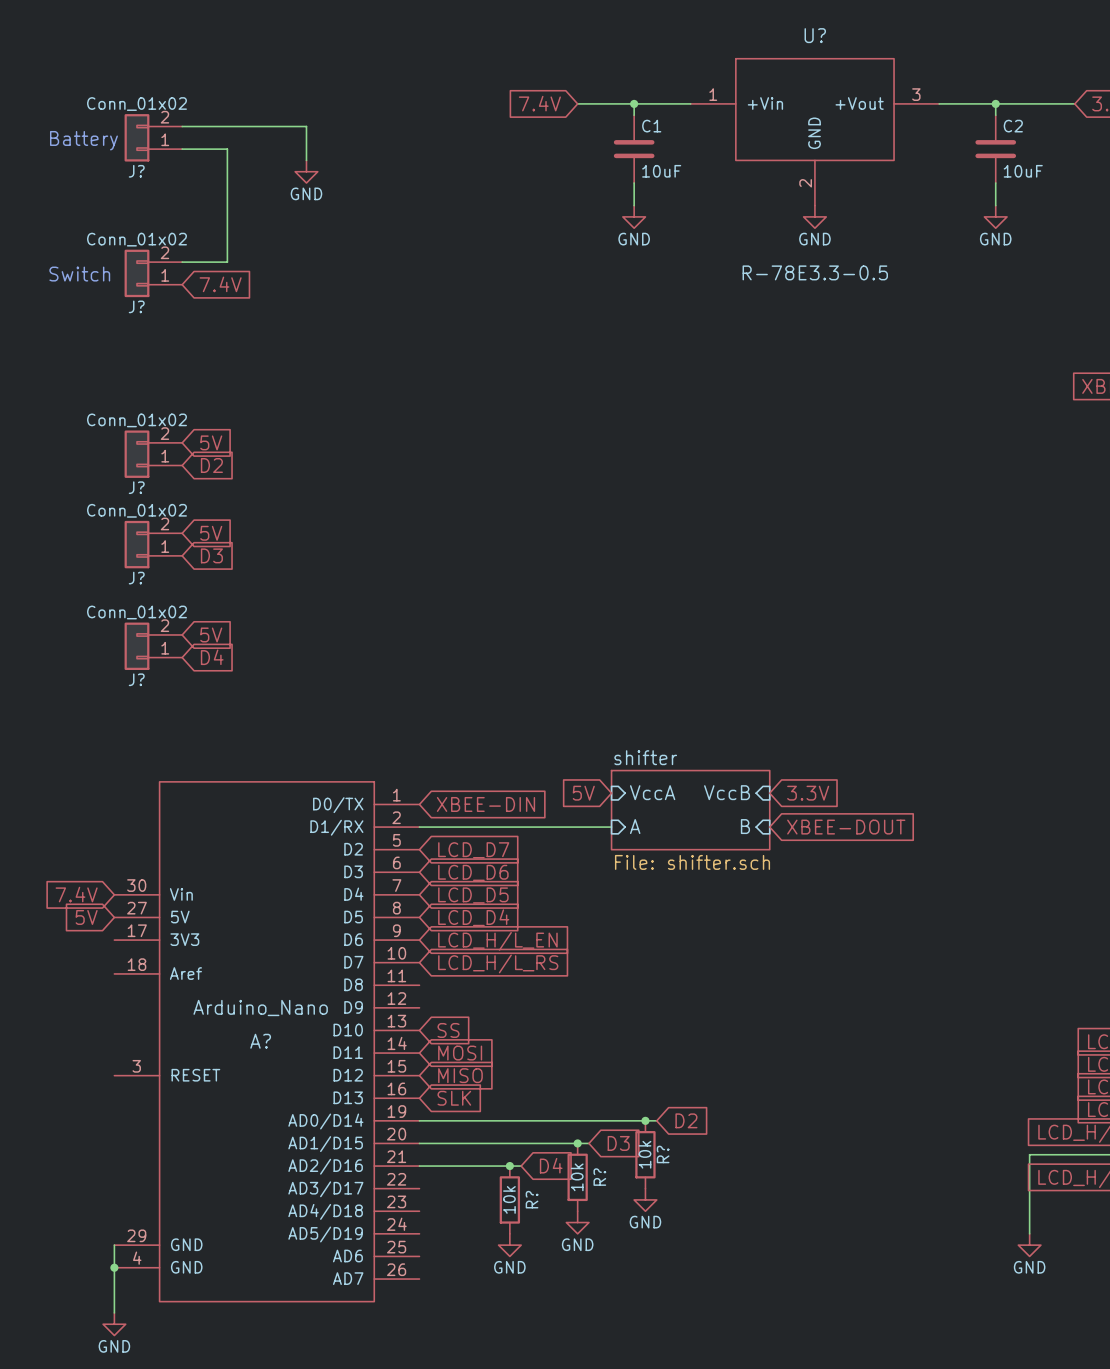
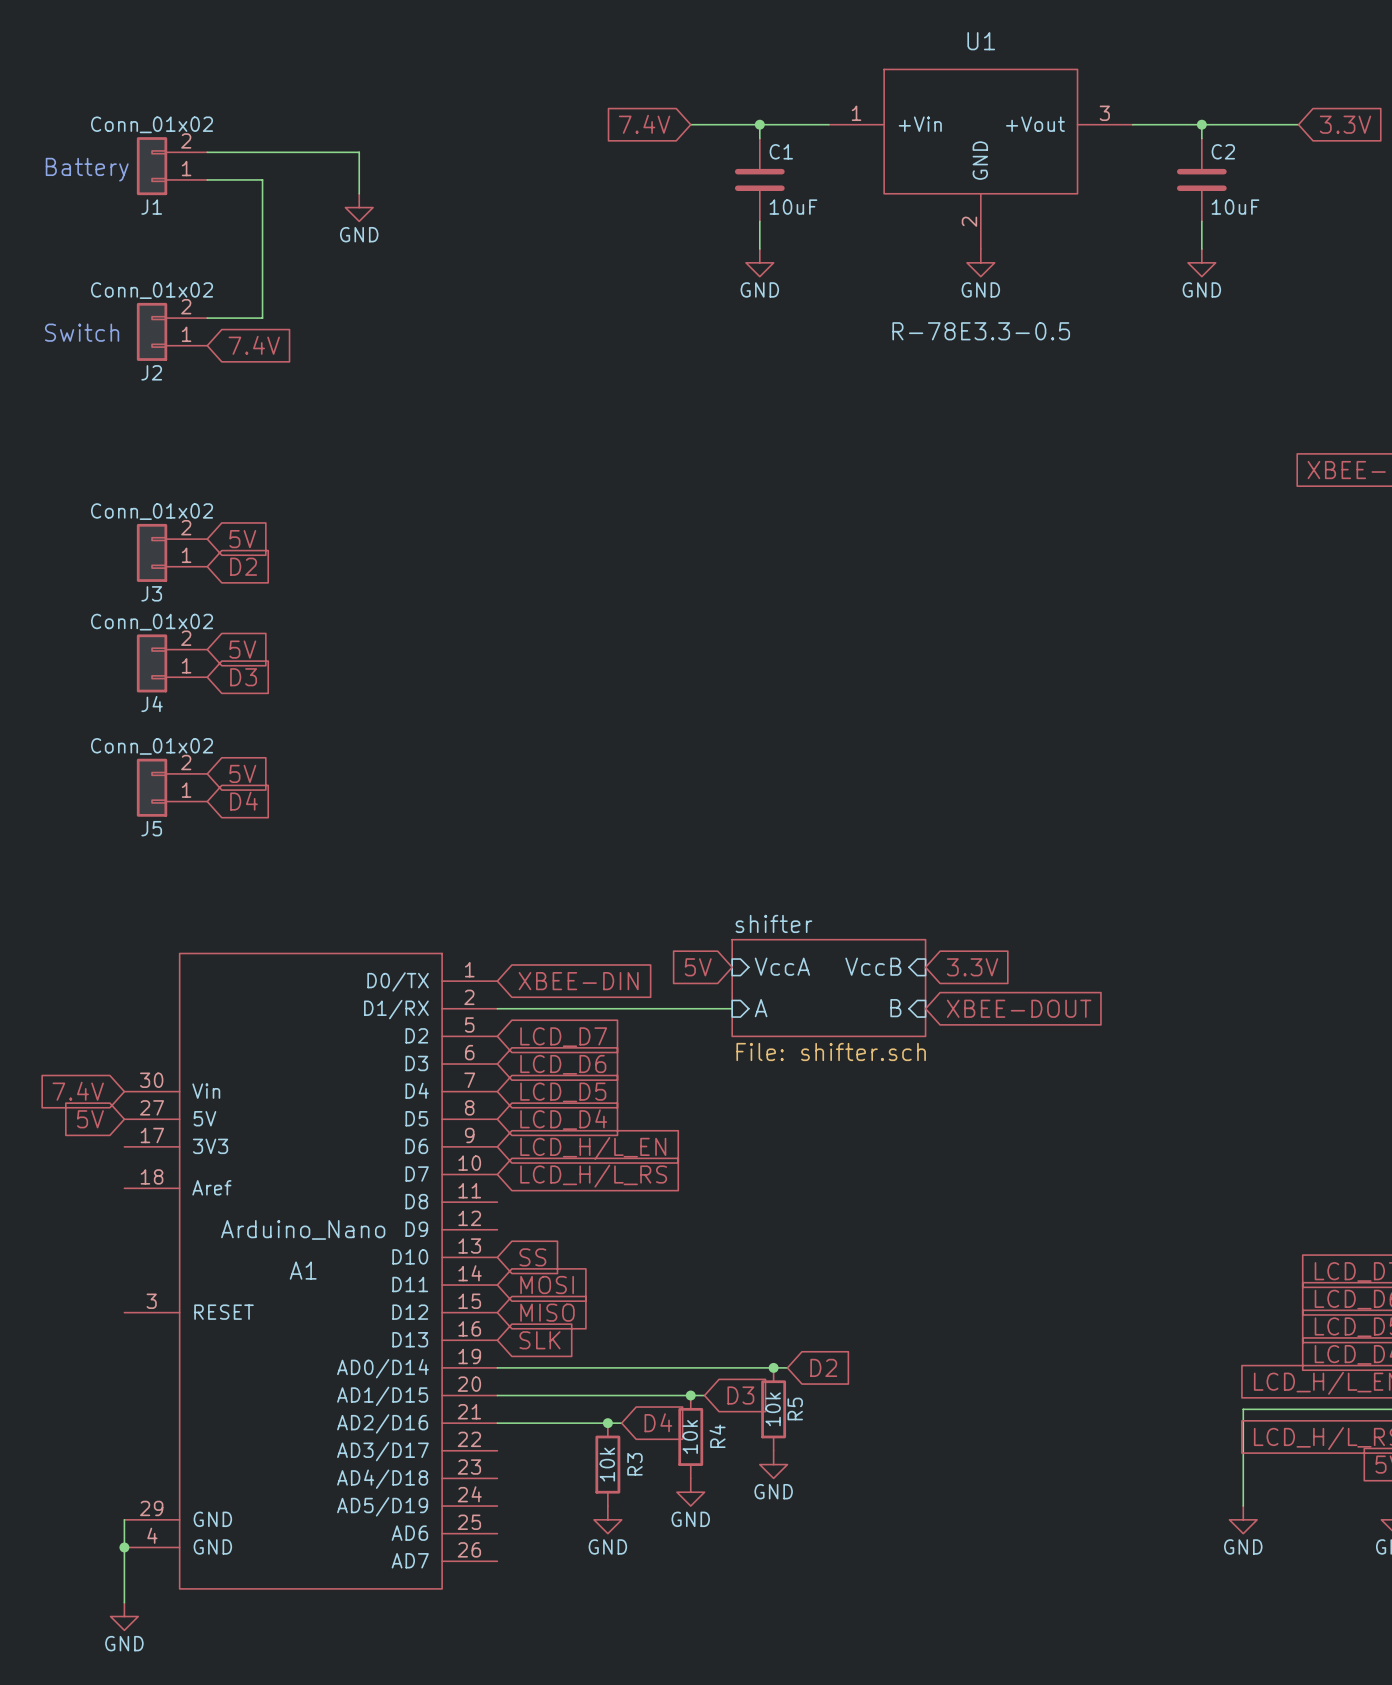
U? name: U? (815, 35) -> U1 (981, 41)
J? name: J? (136, 171) -> J1 (151, 207)
J? name: J? (136, 306) -> J2 (151, 372)
J? name: J? (136, 487) -> J3 (151, 593)
J? name: J? (136, 578) -> J4 (152, 704)
J? name: J? (136, 679) -> J5 (151, 828)
A? name: A? (260, 1041) -> A1 (303, 1270)
R? name: R? (663, 1154) -> R5 (795, 1409)
R? name: R? (599, 1177) -> R4 (717, 1436)
R? name: R? (532, 1199) -> R3 (634, 1464)

